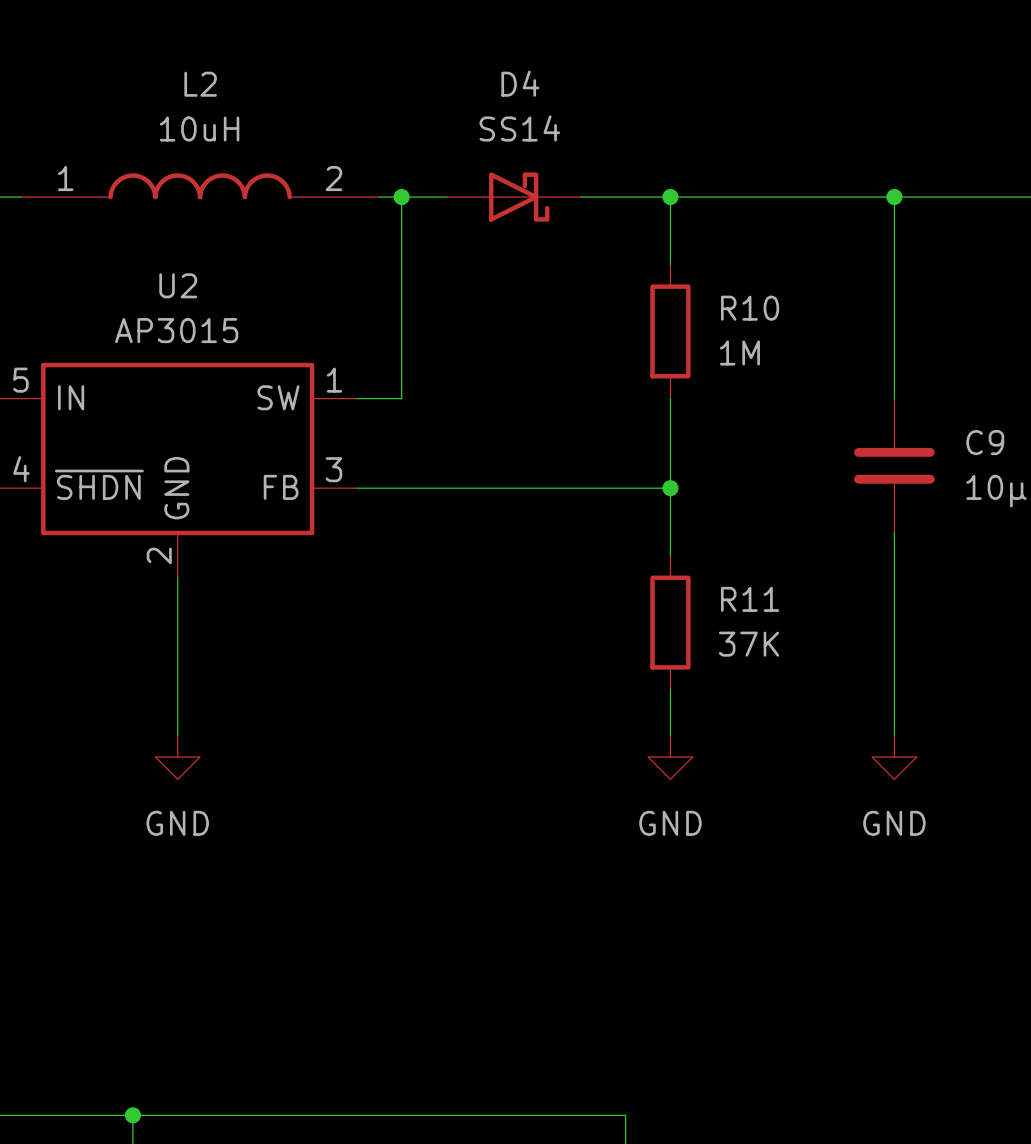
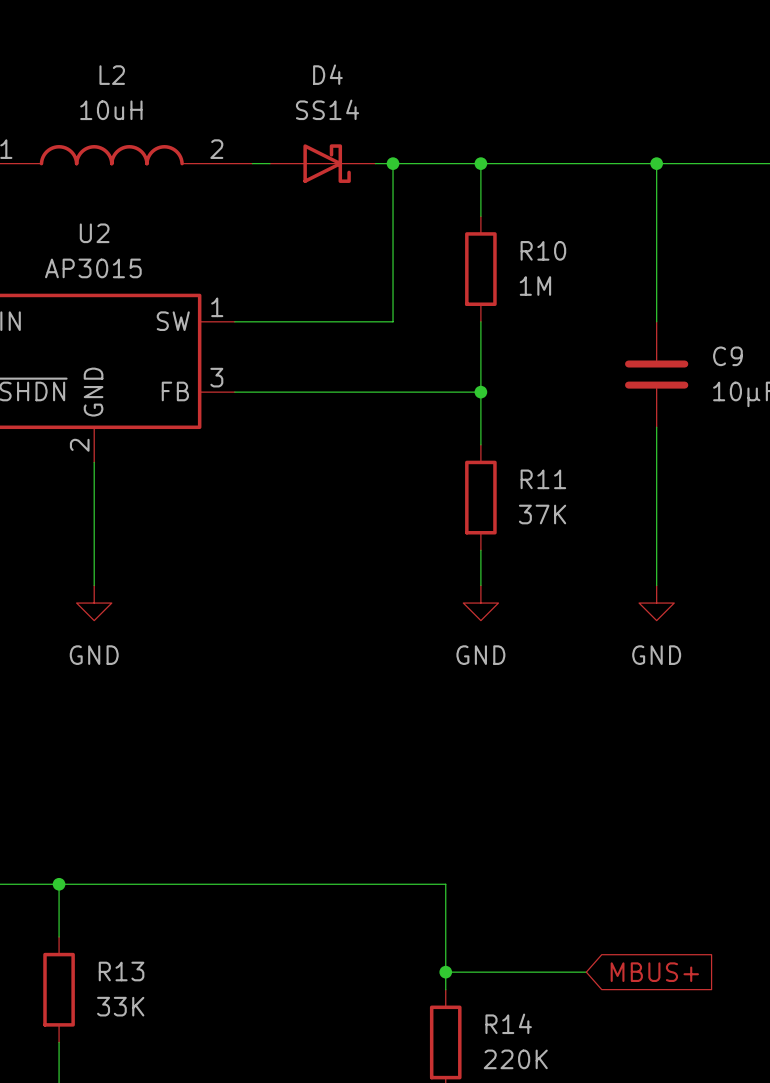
junction: (401, 197) -> none
wire: (446, 197) (401, 197) (401, 398) -> (393, 163) (393, 321) (269, 321)
D4 position: (513, 197) -> (322, 163)
junction: none -> (393, 163)

